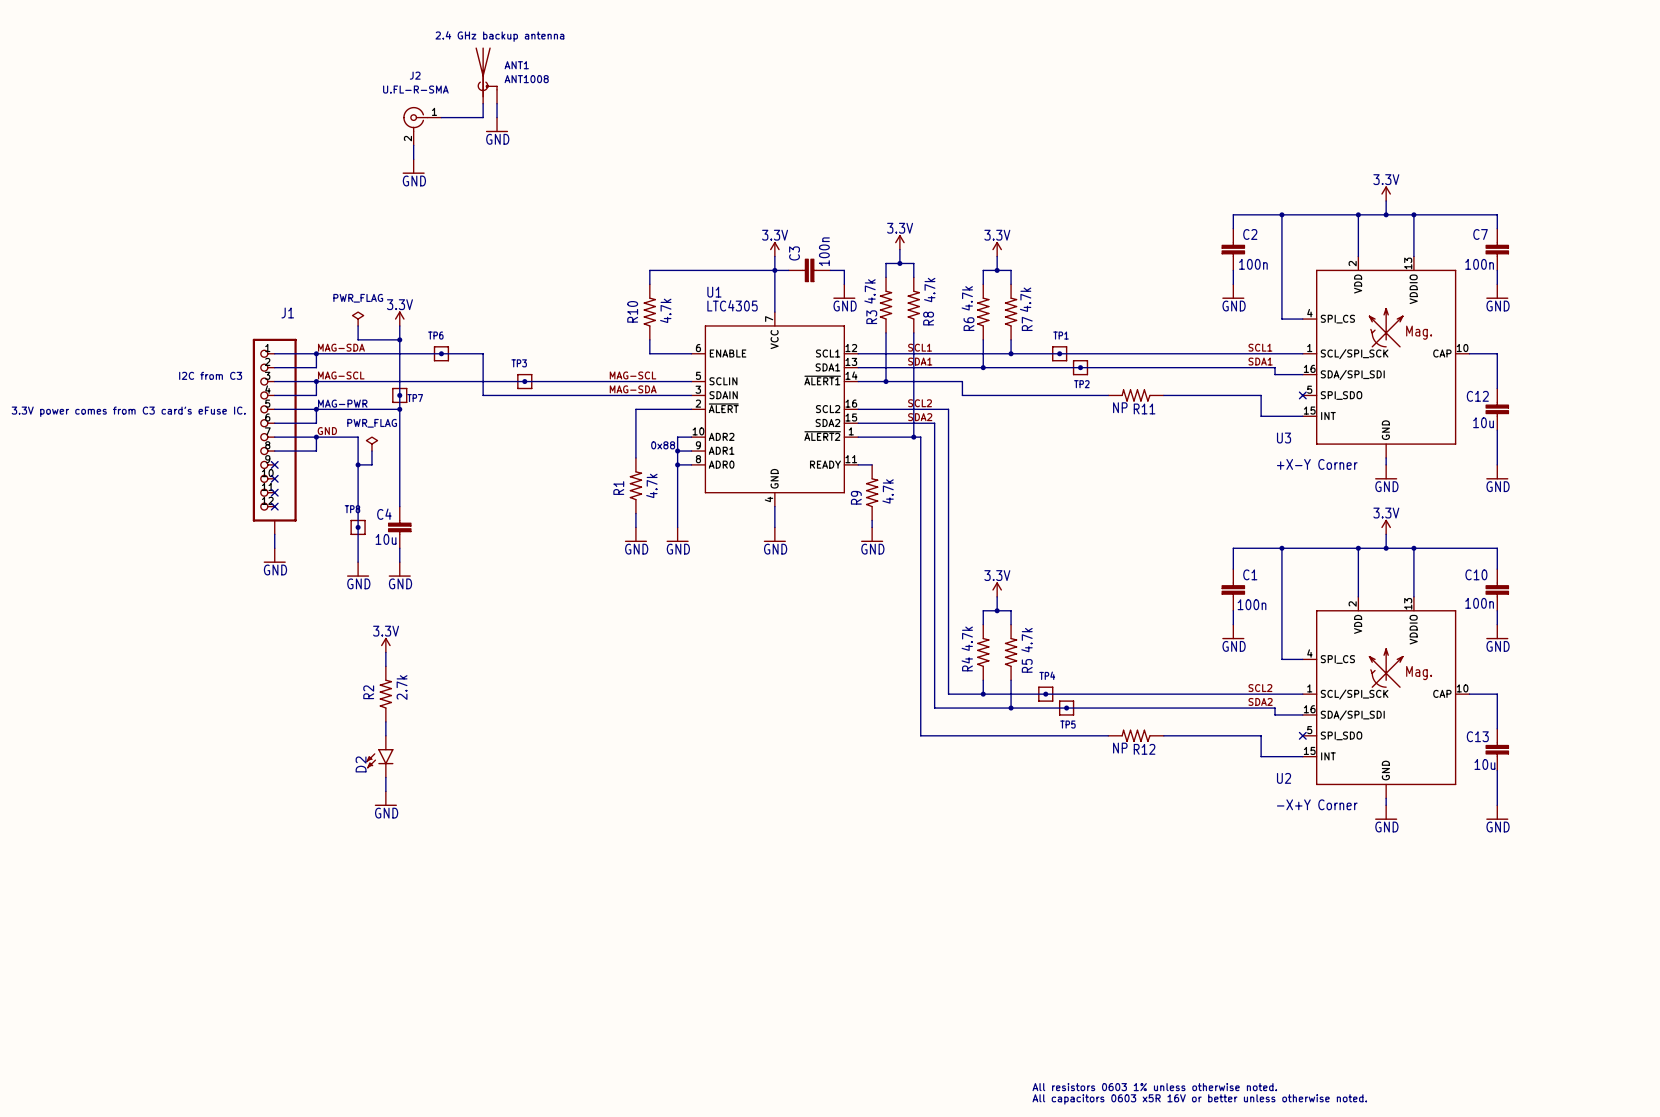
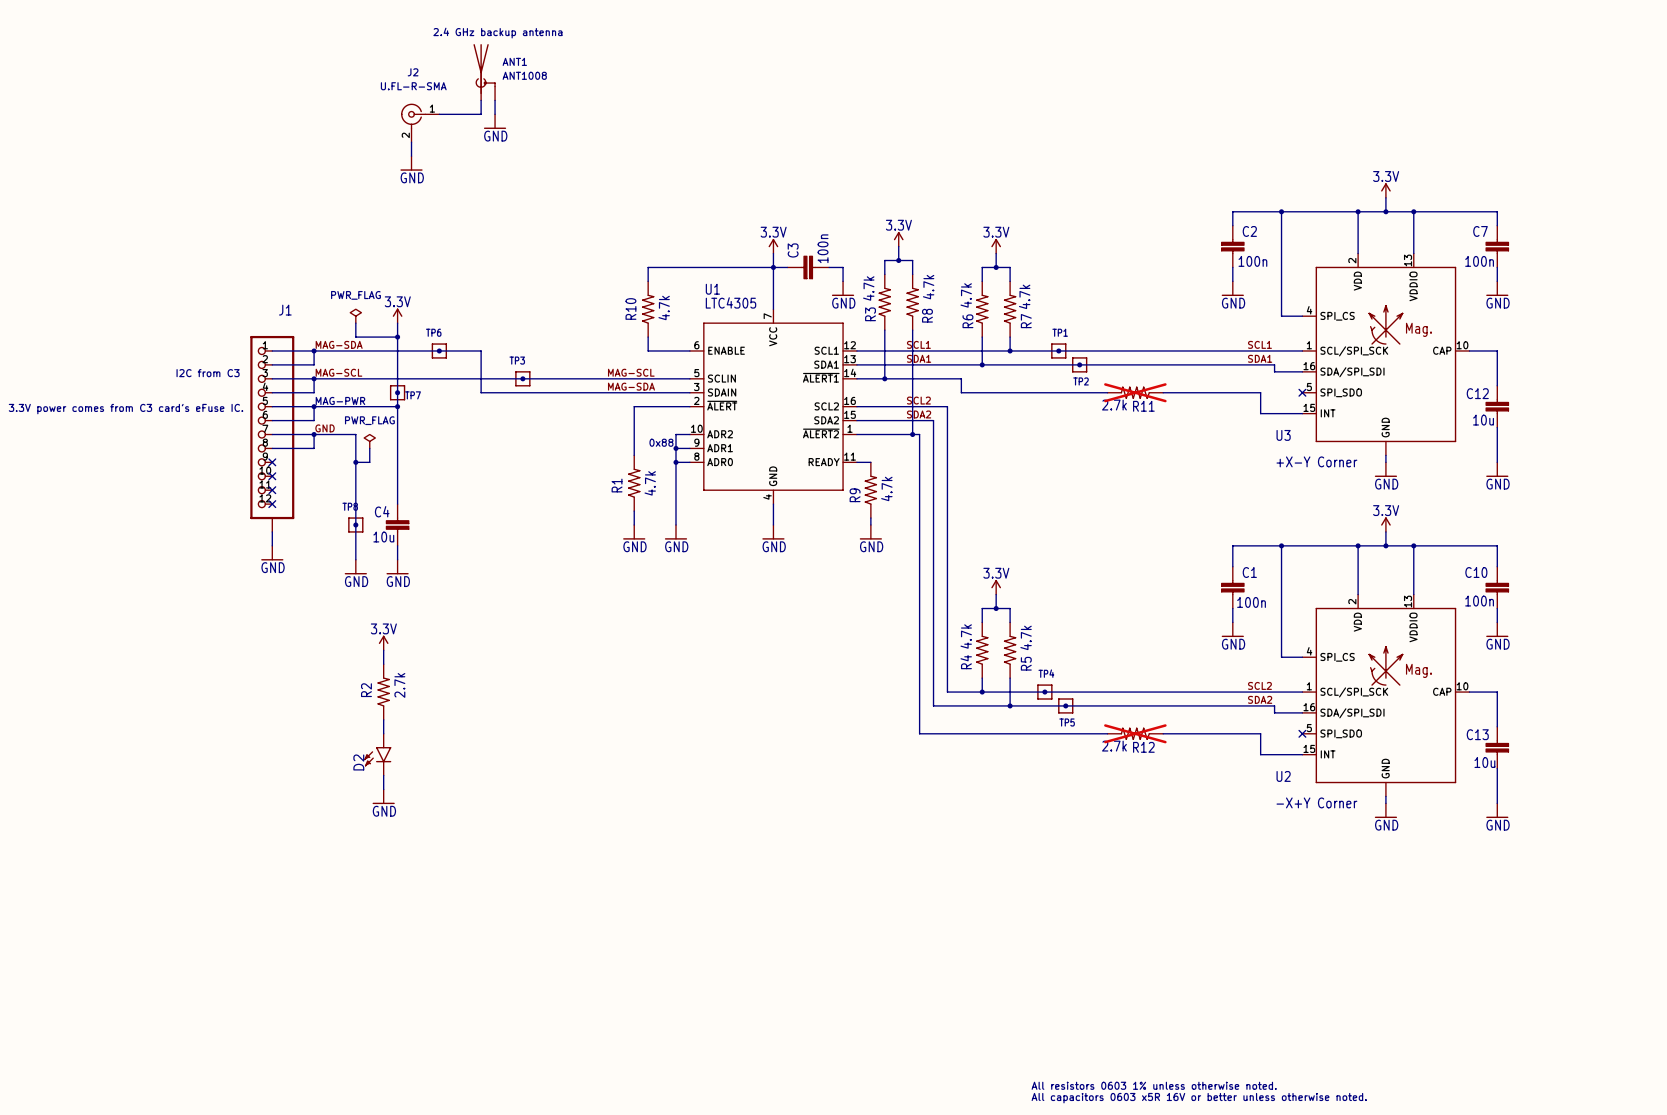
R11 do-not-place cross: none -> (1135, 392)
R11 value: NP (1120, 407) -> 2.7k (1114, 405)
R12 do-not-place cross: none -> (1135, 733)
R12 value: NP (1120, 748) -> 2.7k (1114, 746)

